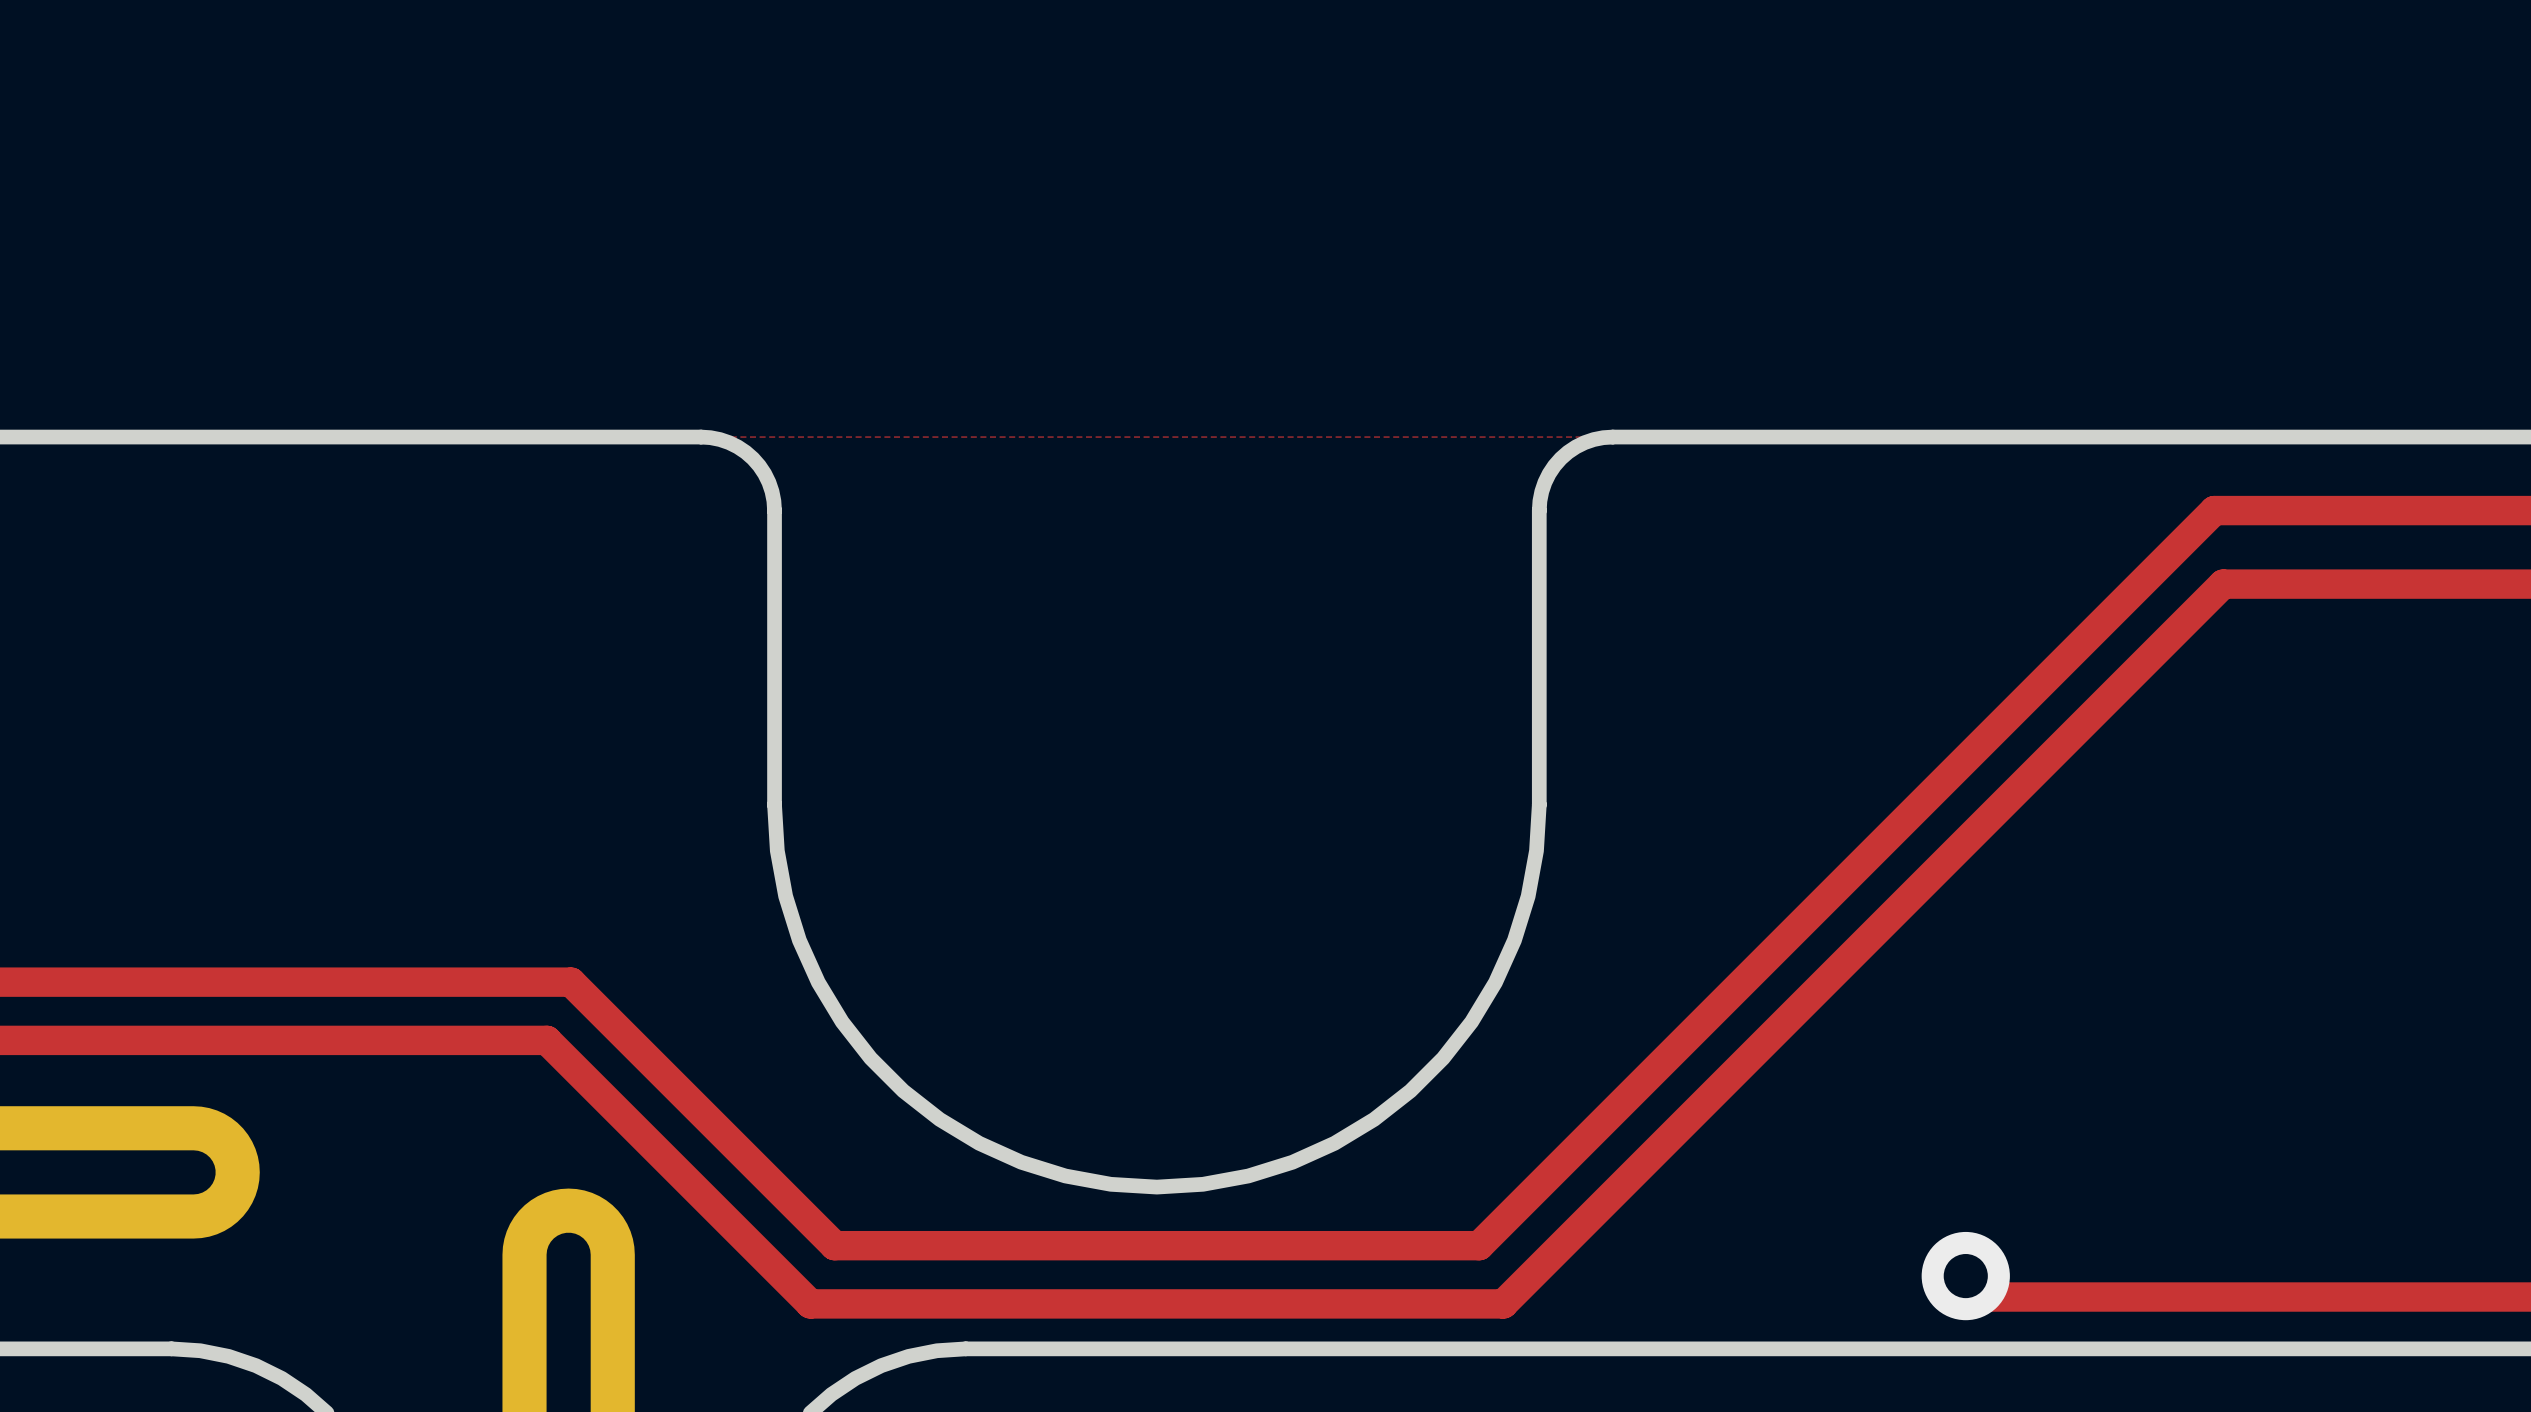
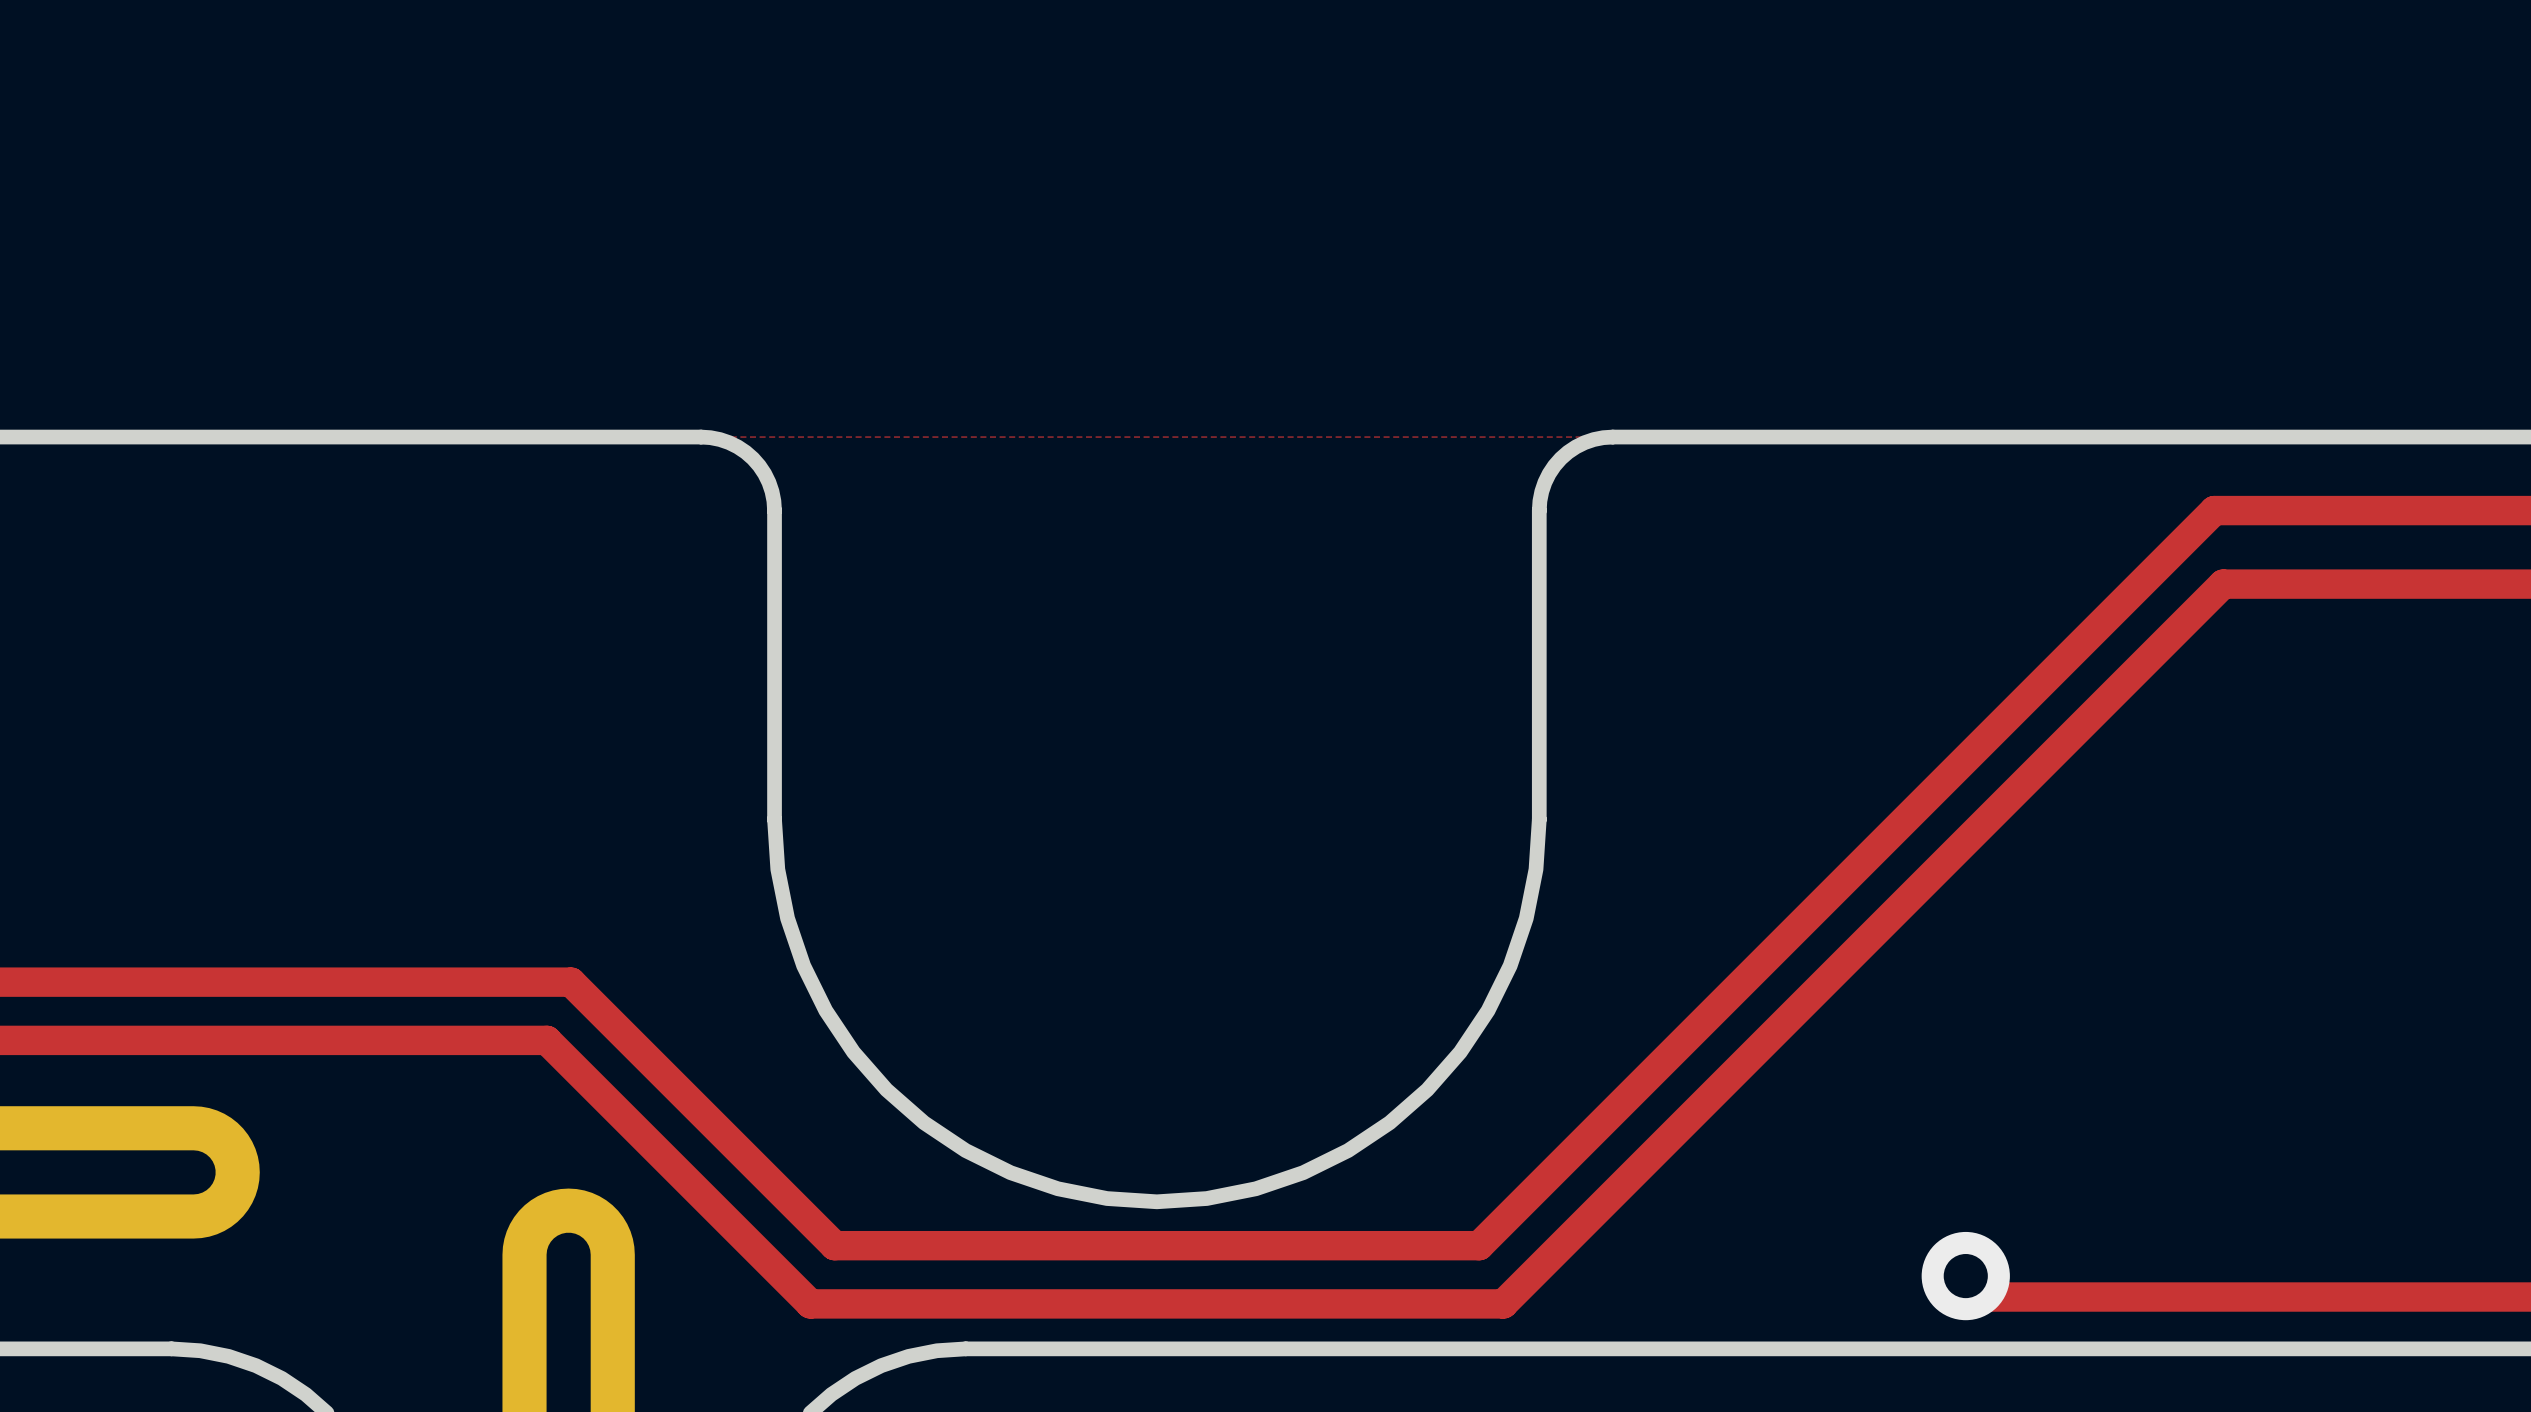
board edge: (774, 804) (777, 850) (785, 896) (799, 940) (818, 982) (842, 1021) (870, 1058) (903, 1090) (939, 1119) (979, 1143) (1021, 1162) (1065, 1175) (1110, 1184) (1156, 1187) (1203, 1184) (1248, 1175) (1292, 1162) (1334, 1143) (1374, 1119) (1410, 1090) (1443, 1058) (1471, 1021) (1495, 982) (1514, 940) (1528, 896) (1536, 850) (1539, 804) -> (774, 804) (777, 869) (787, 918) (803, 965) (825, 1010) (853, 1052) (886, 1089) (924, 1122) (965, 1150) (1010, 1172) (1057, 1188) (1107, 1198) (1156, 1201) (1206, 1198) (1255, 1188) (1303, 1172) (1348, 1150) (1389, 1122) (1427, 1089) (1460, 1052) (1488, 1010) (1510, 965) (1526, 918) (1536, 869) (1539, 804)

